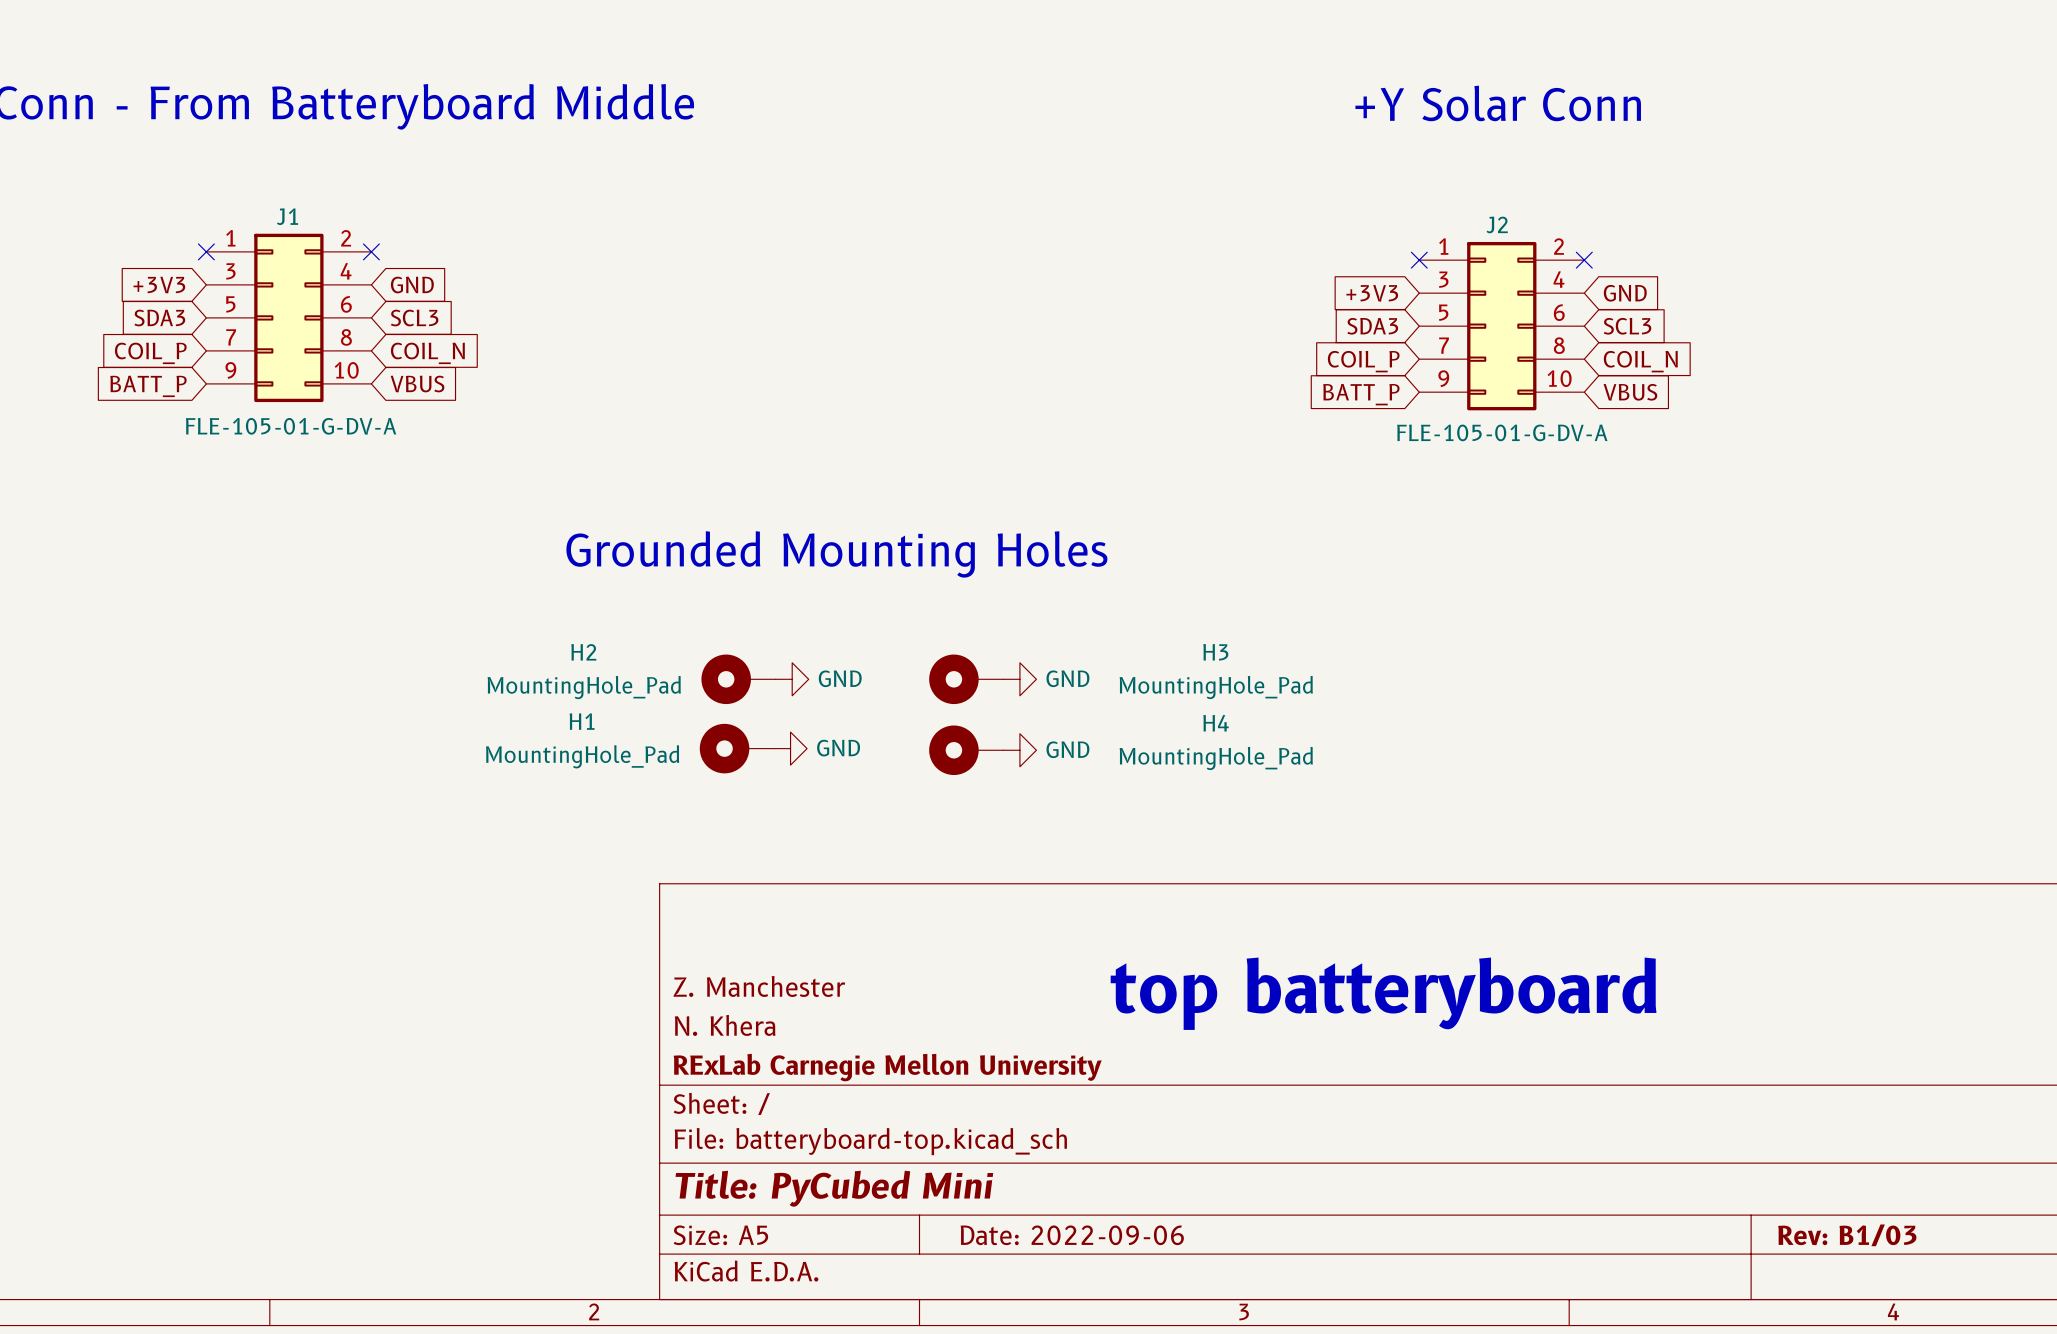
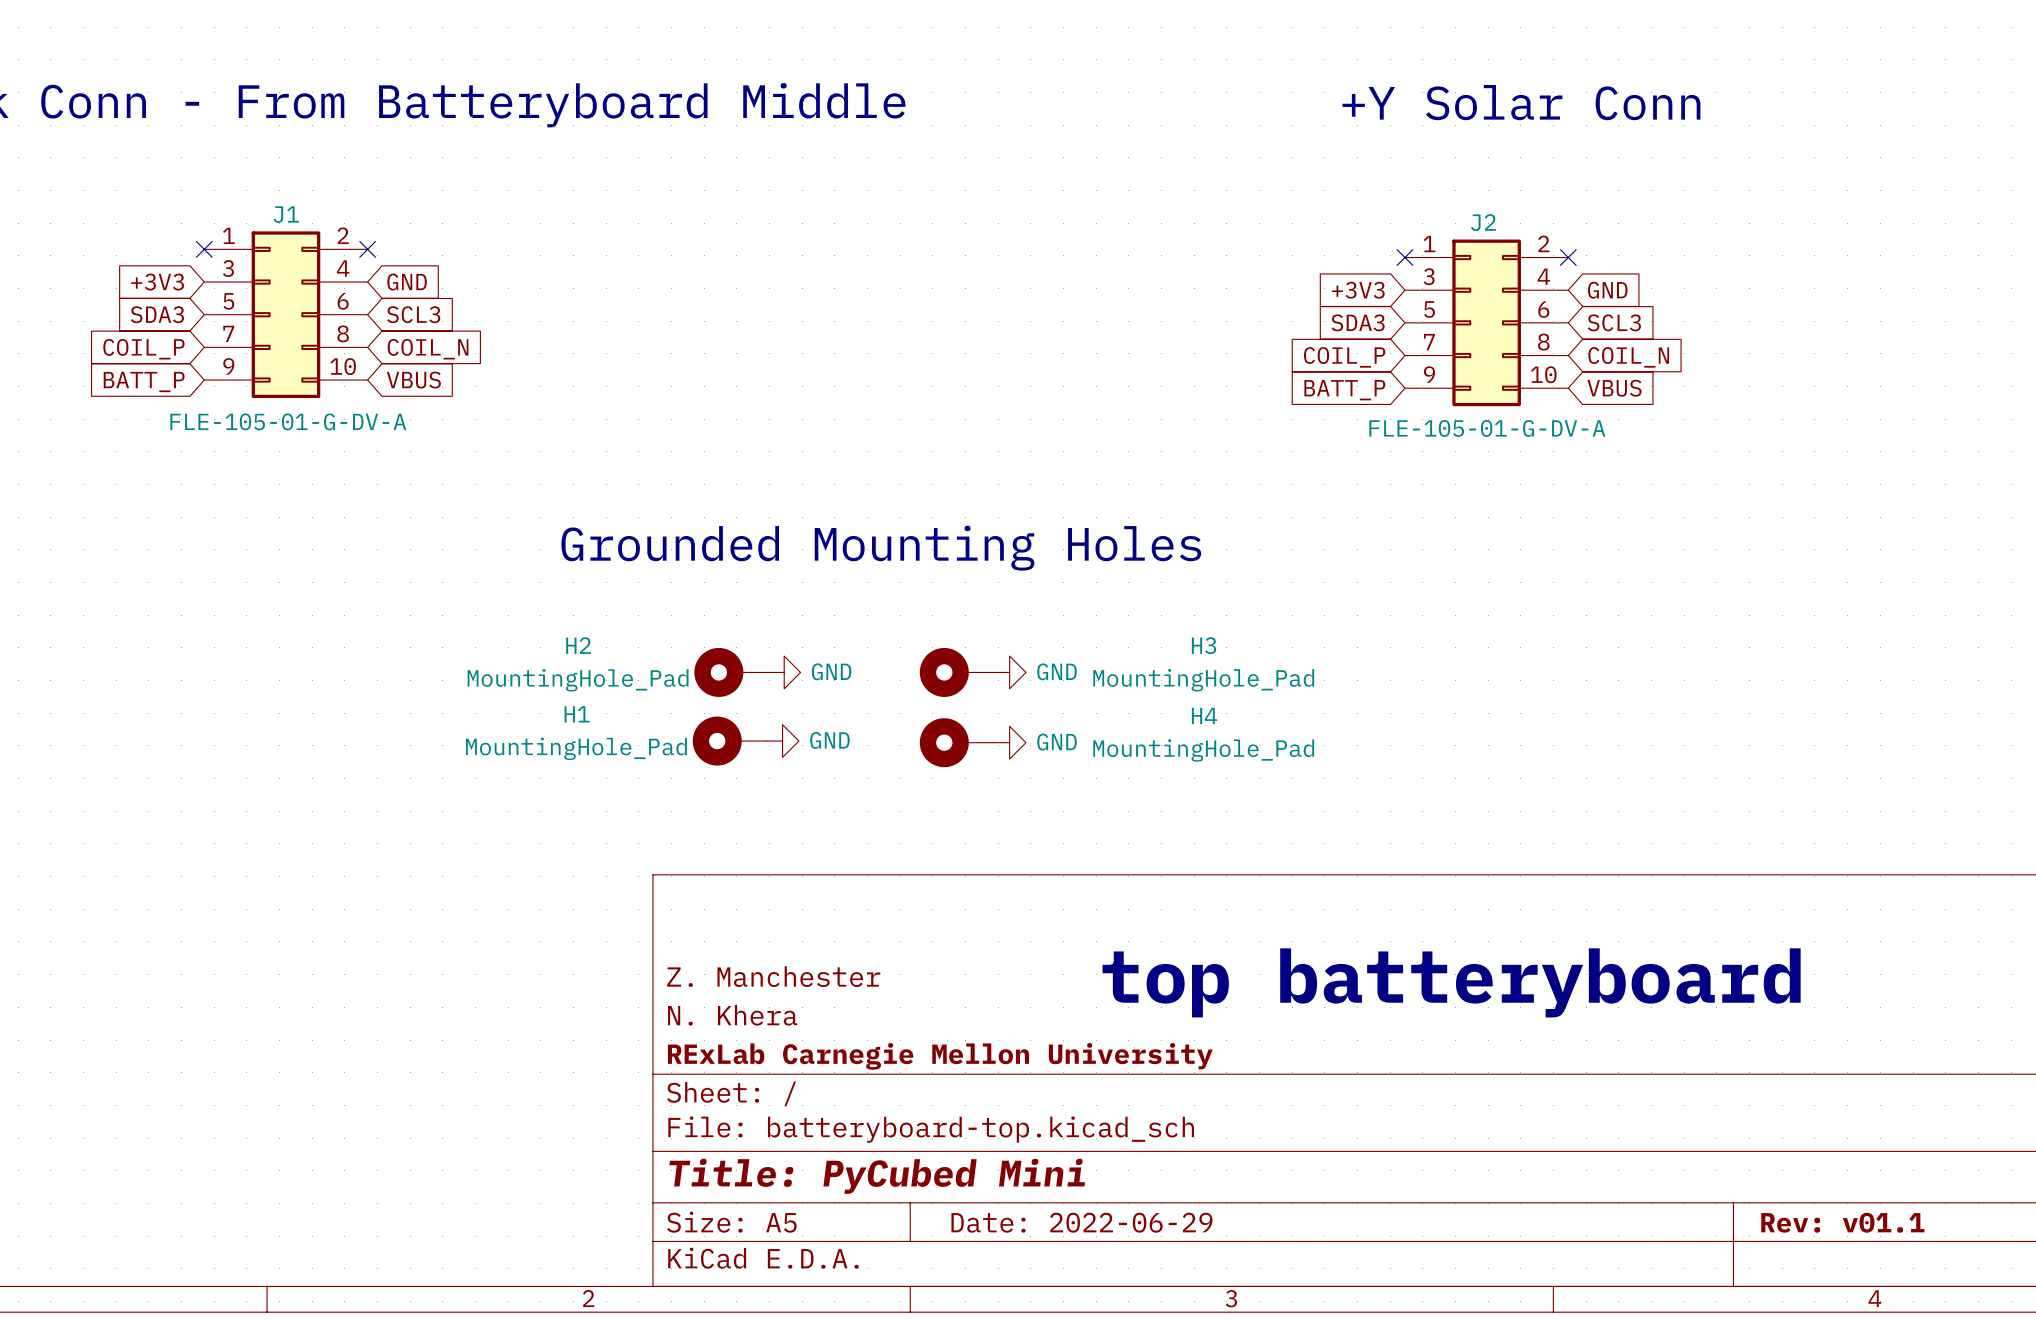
title block: Date: 2022-09-06 (1072, 1235) -> Date: 2022-06-29 (1081, 1222)
title block: Rev: B1/03 (1847, 1235) -> Rev: v01.1 (1842, 1222)

